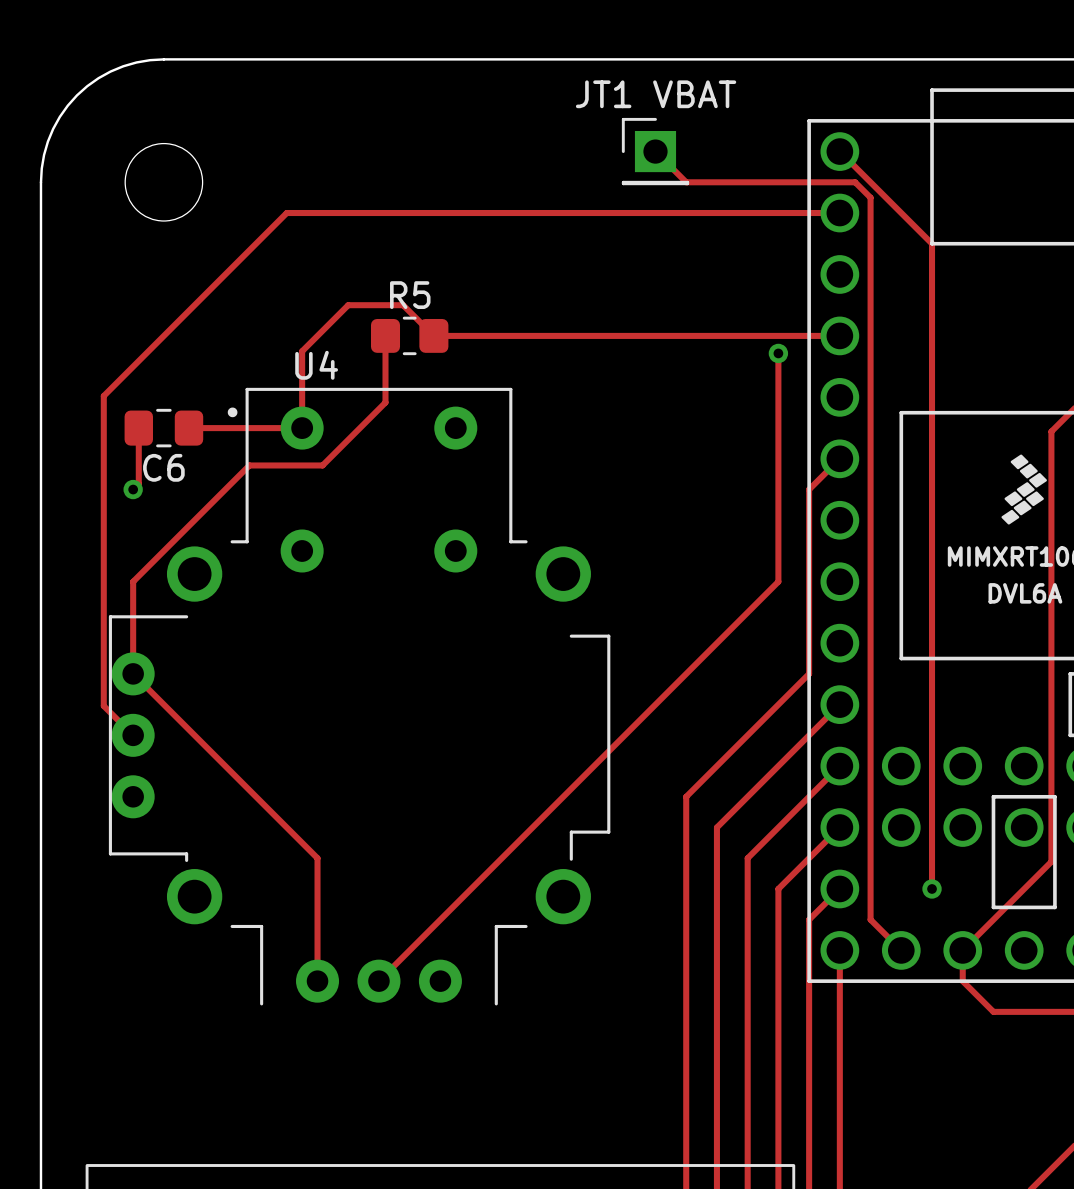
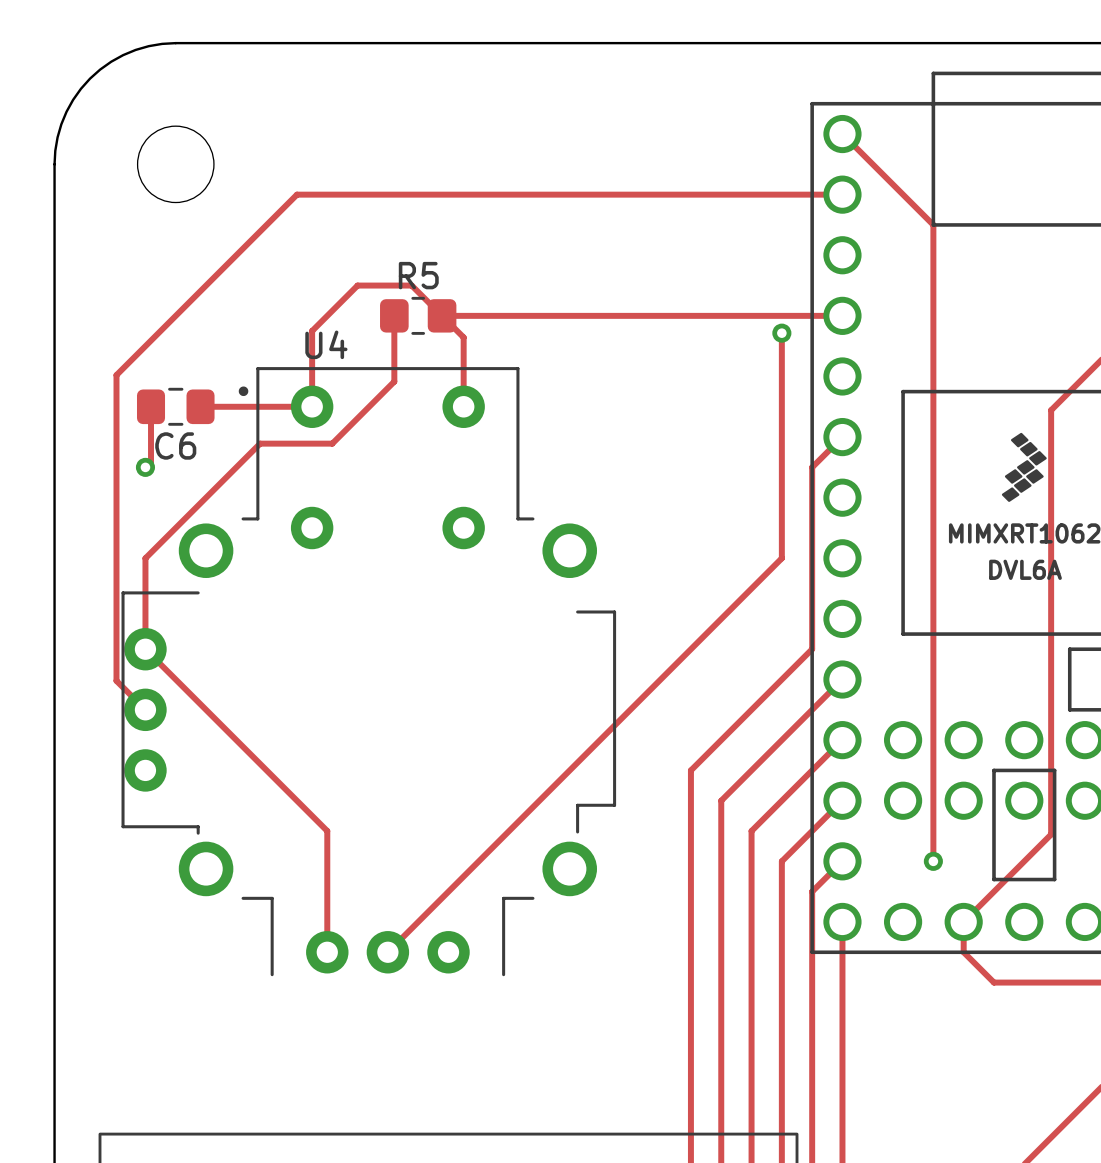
track: (655, 151) (686, 182) (855, 182) (870, 197) (870, 919) (901, 950) -> none
JT1 VBAT: (655, 151) -> none
track: none -> (442, 315) (463, 337) (463, 406)

